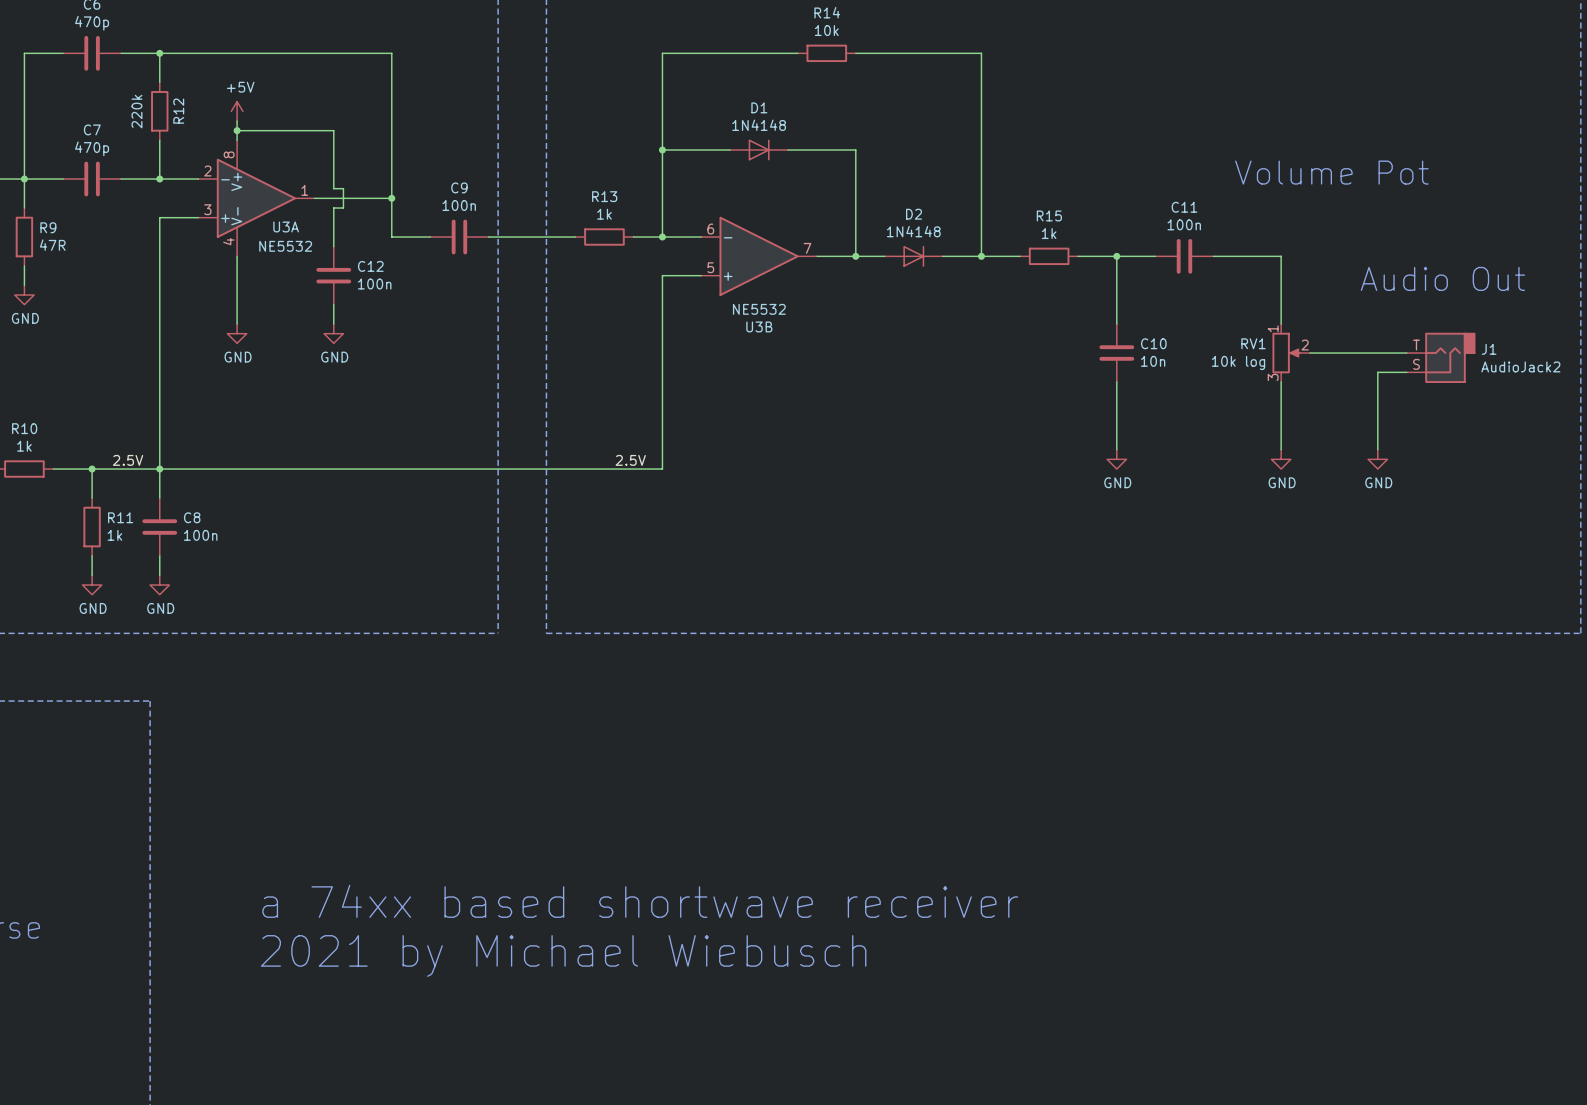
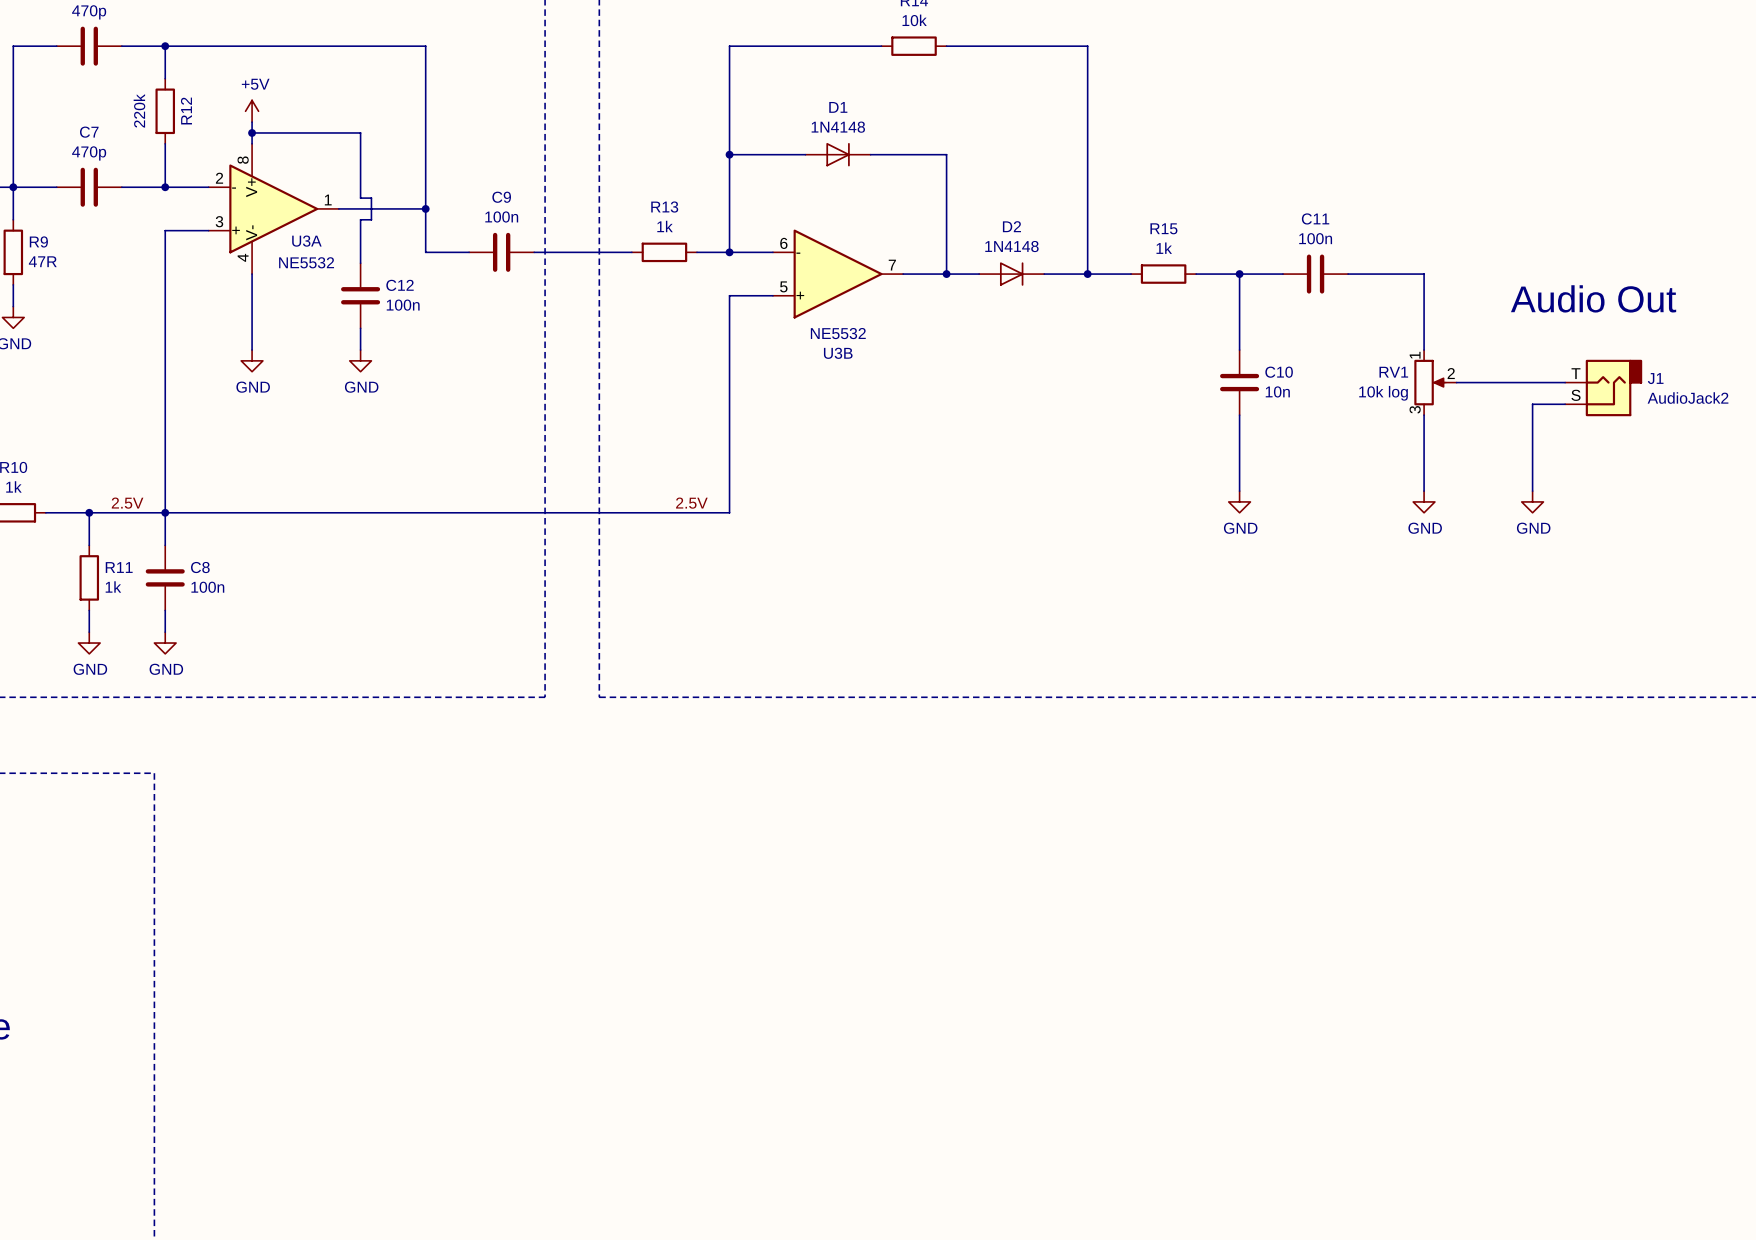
text: Volume Pot (1331, 172) -> none
text: a 74xx based shortwave receiver (640, 901) -> none
text: 2021 by Michael Wiebusch (563, 955) -> none

